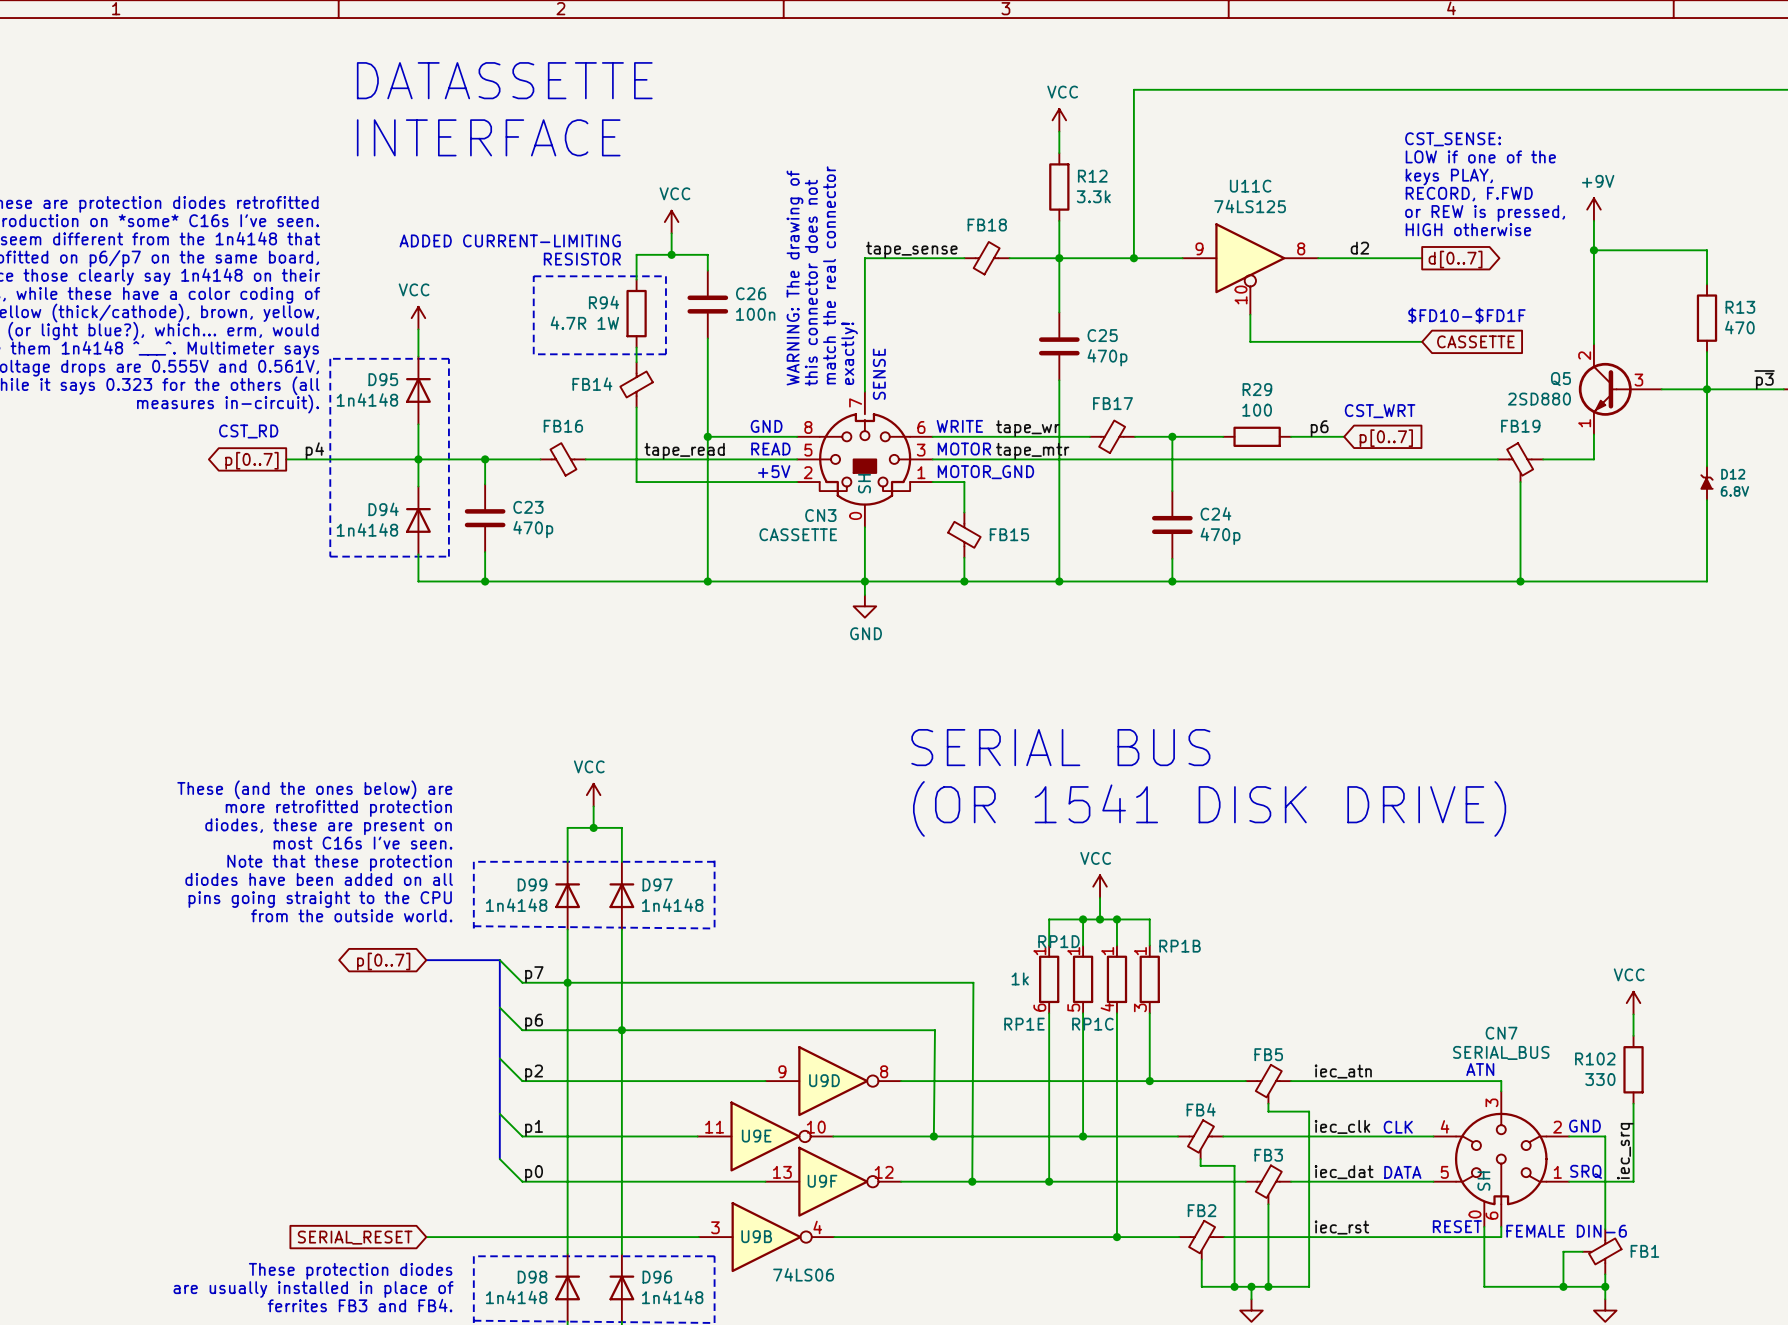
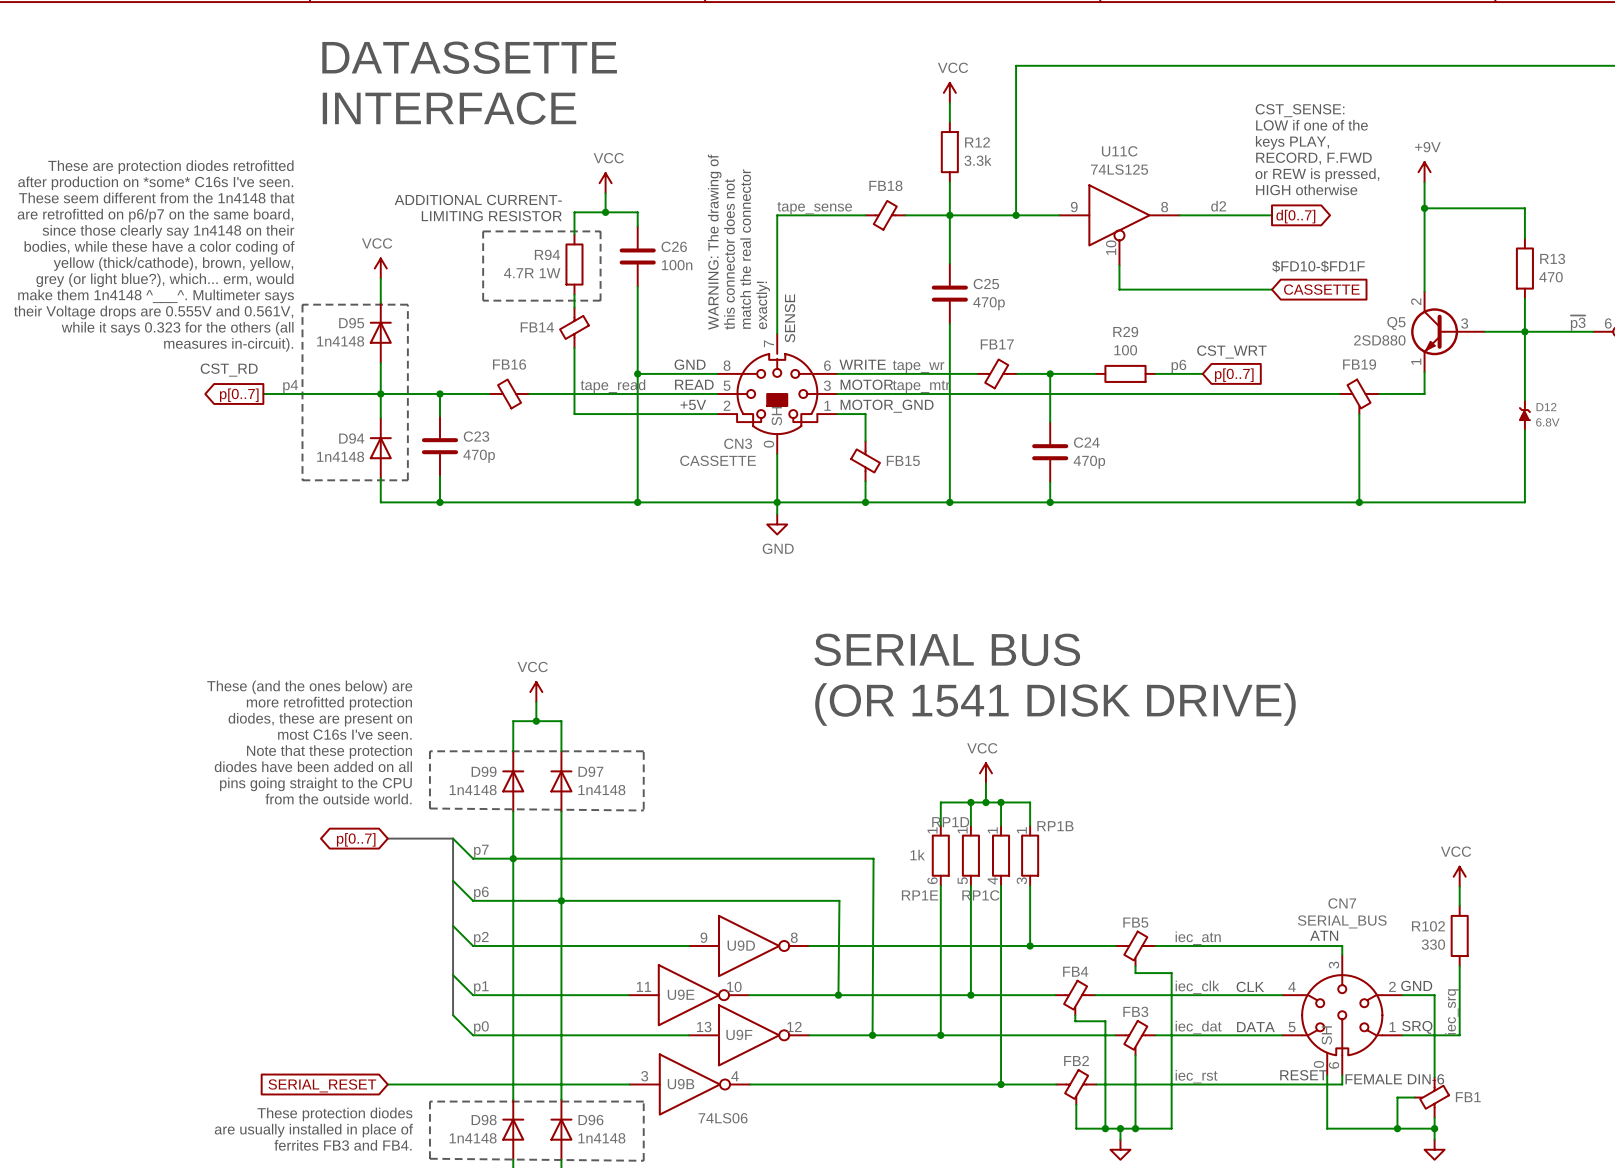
text: ADDED CURRENT-LIMITING (510, 240) -> ADDITIONAL CURRENT- (478, 199)
text: RESISTOR (582, 259) -> LIMITING RESISTOR (491, 216)

